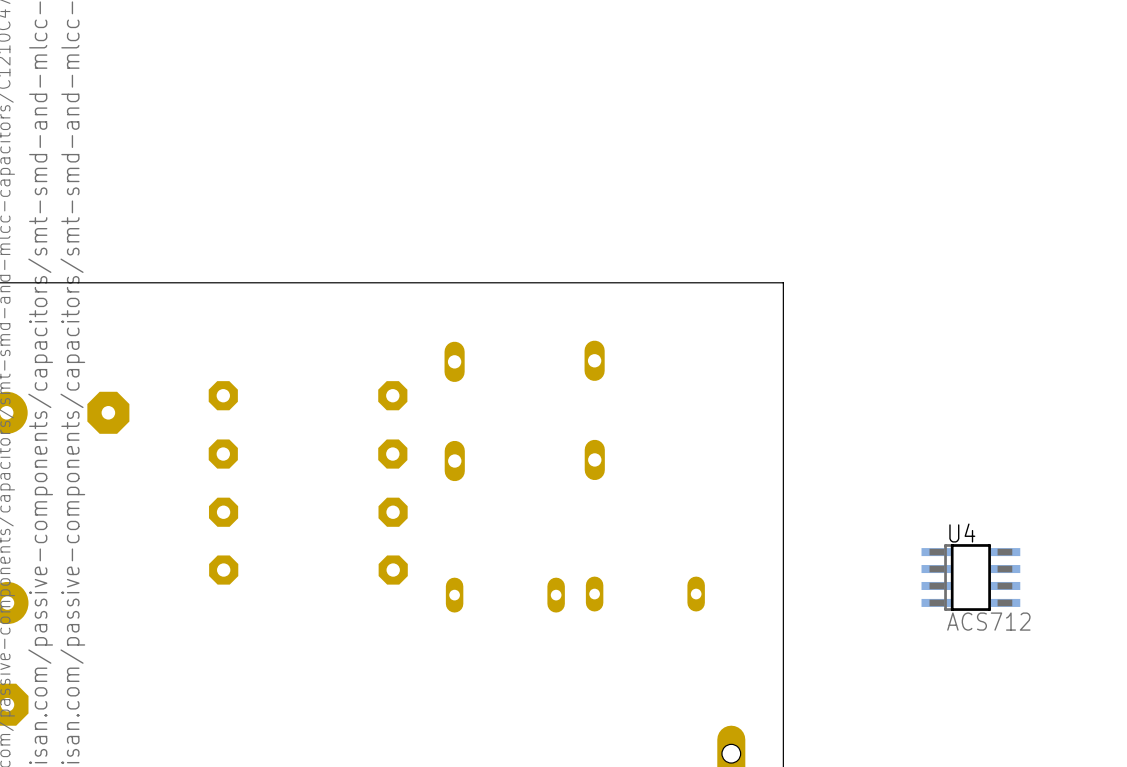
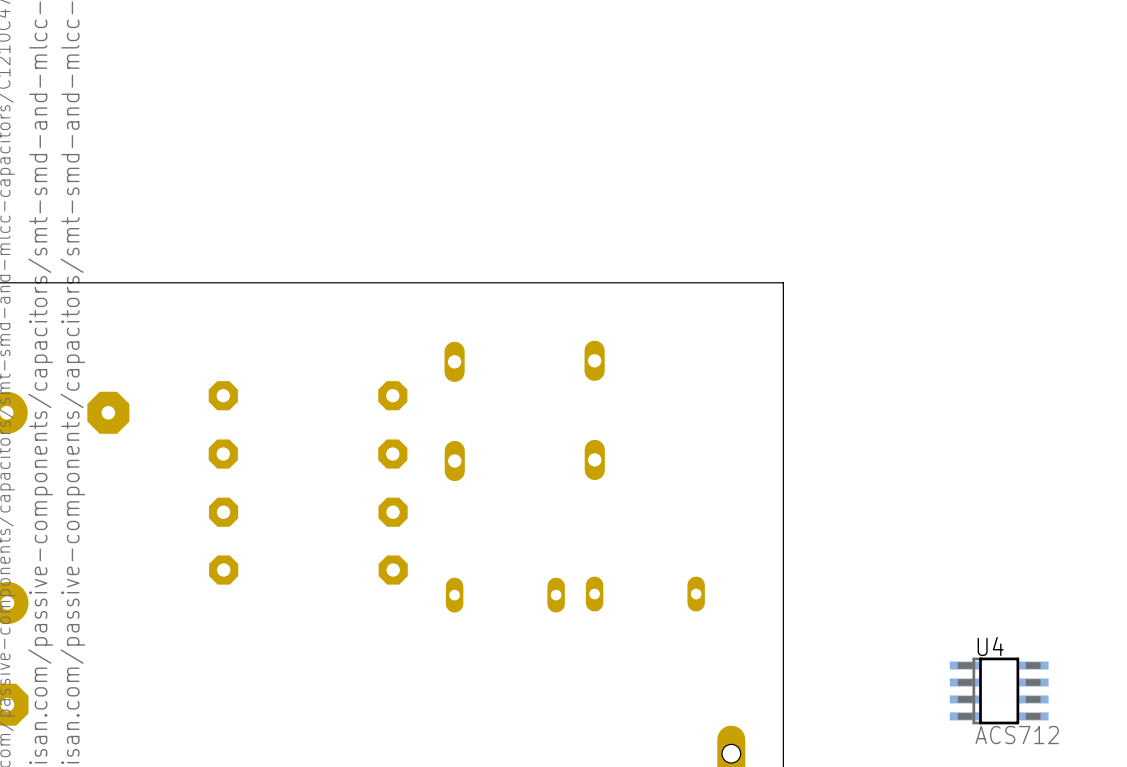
U4 position: (970, 577) -> (999, 690)

